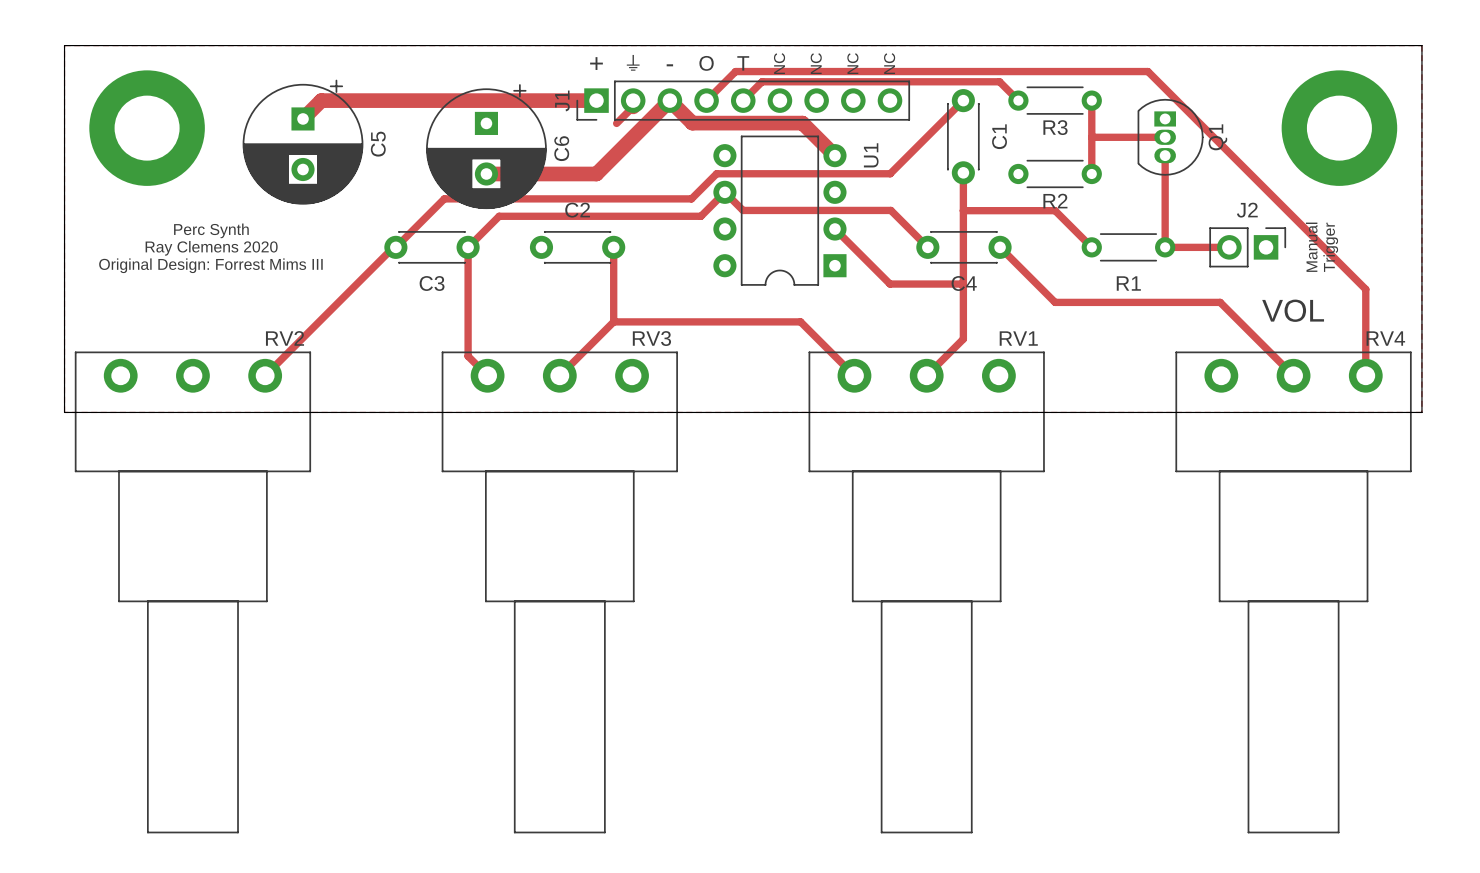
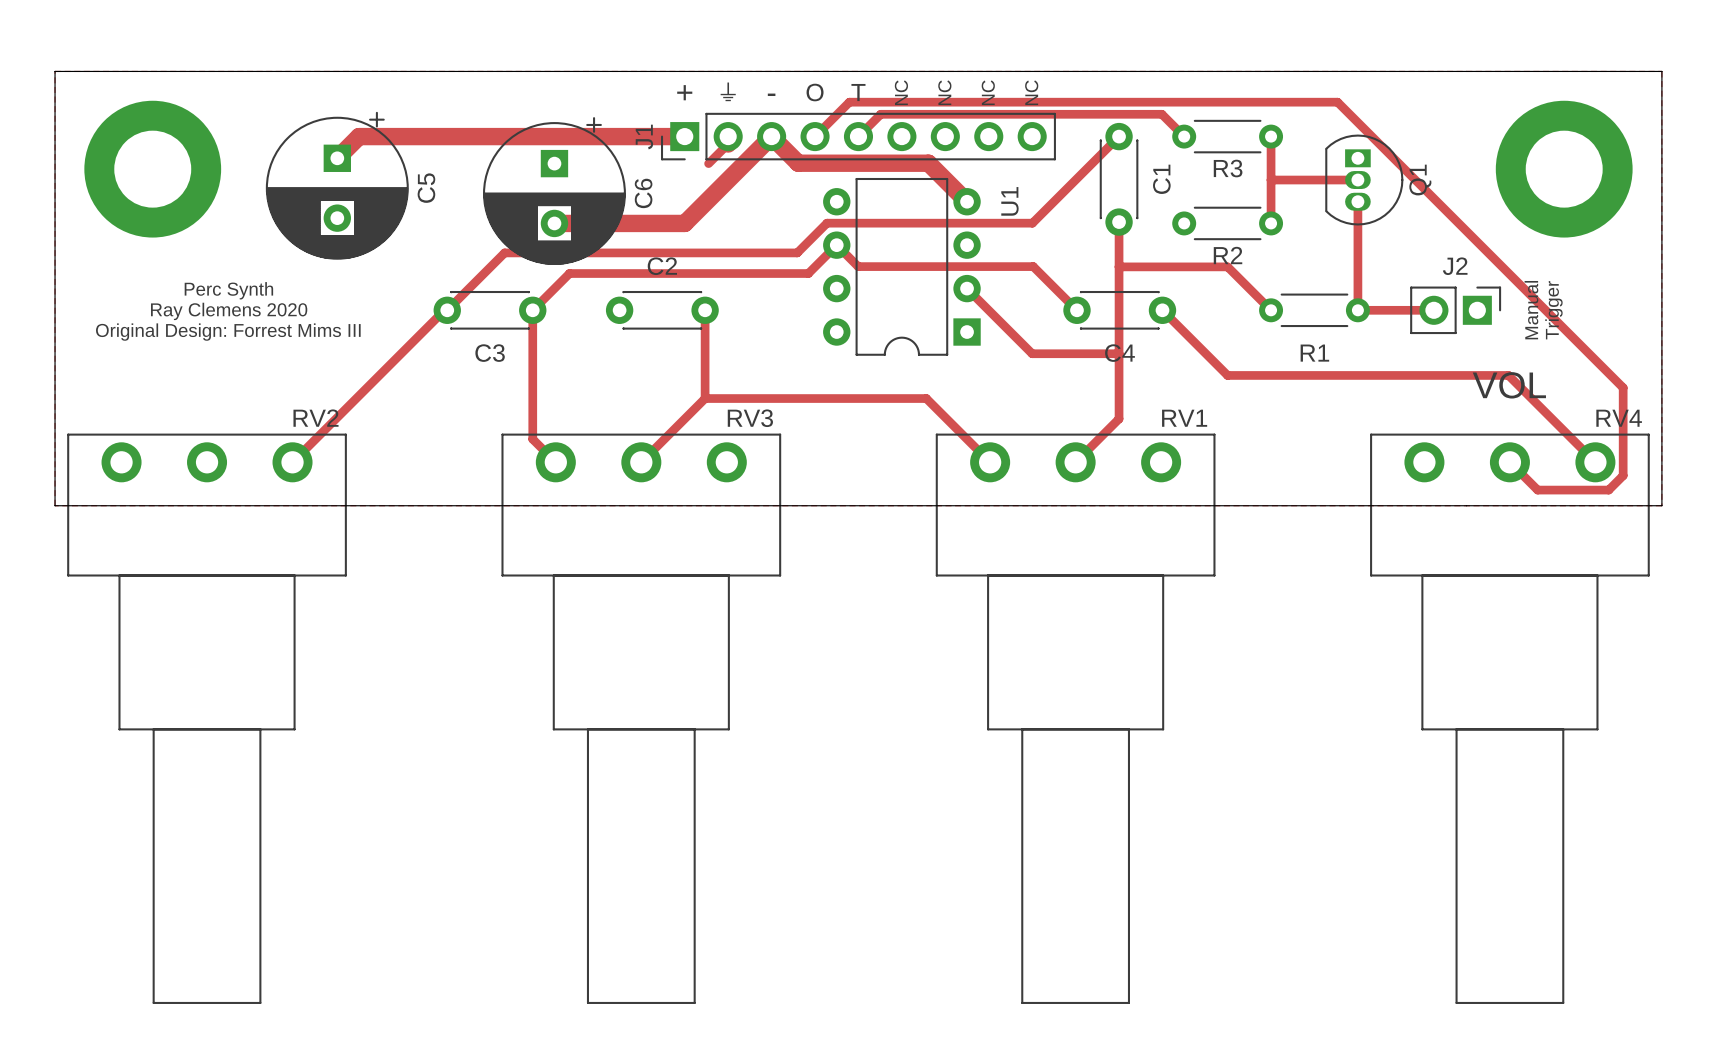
track: (1365, 289) (1365, 375) -> (1595, 360) (1623, 387) (1623, 475) (1608, 490) (1537, 490) (1509, 462)
track: (1220, 302) (1293, 375) -> (1423, 375) (1508, 375) (1595, 462)

